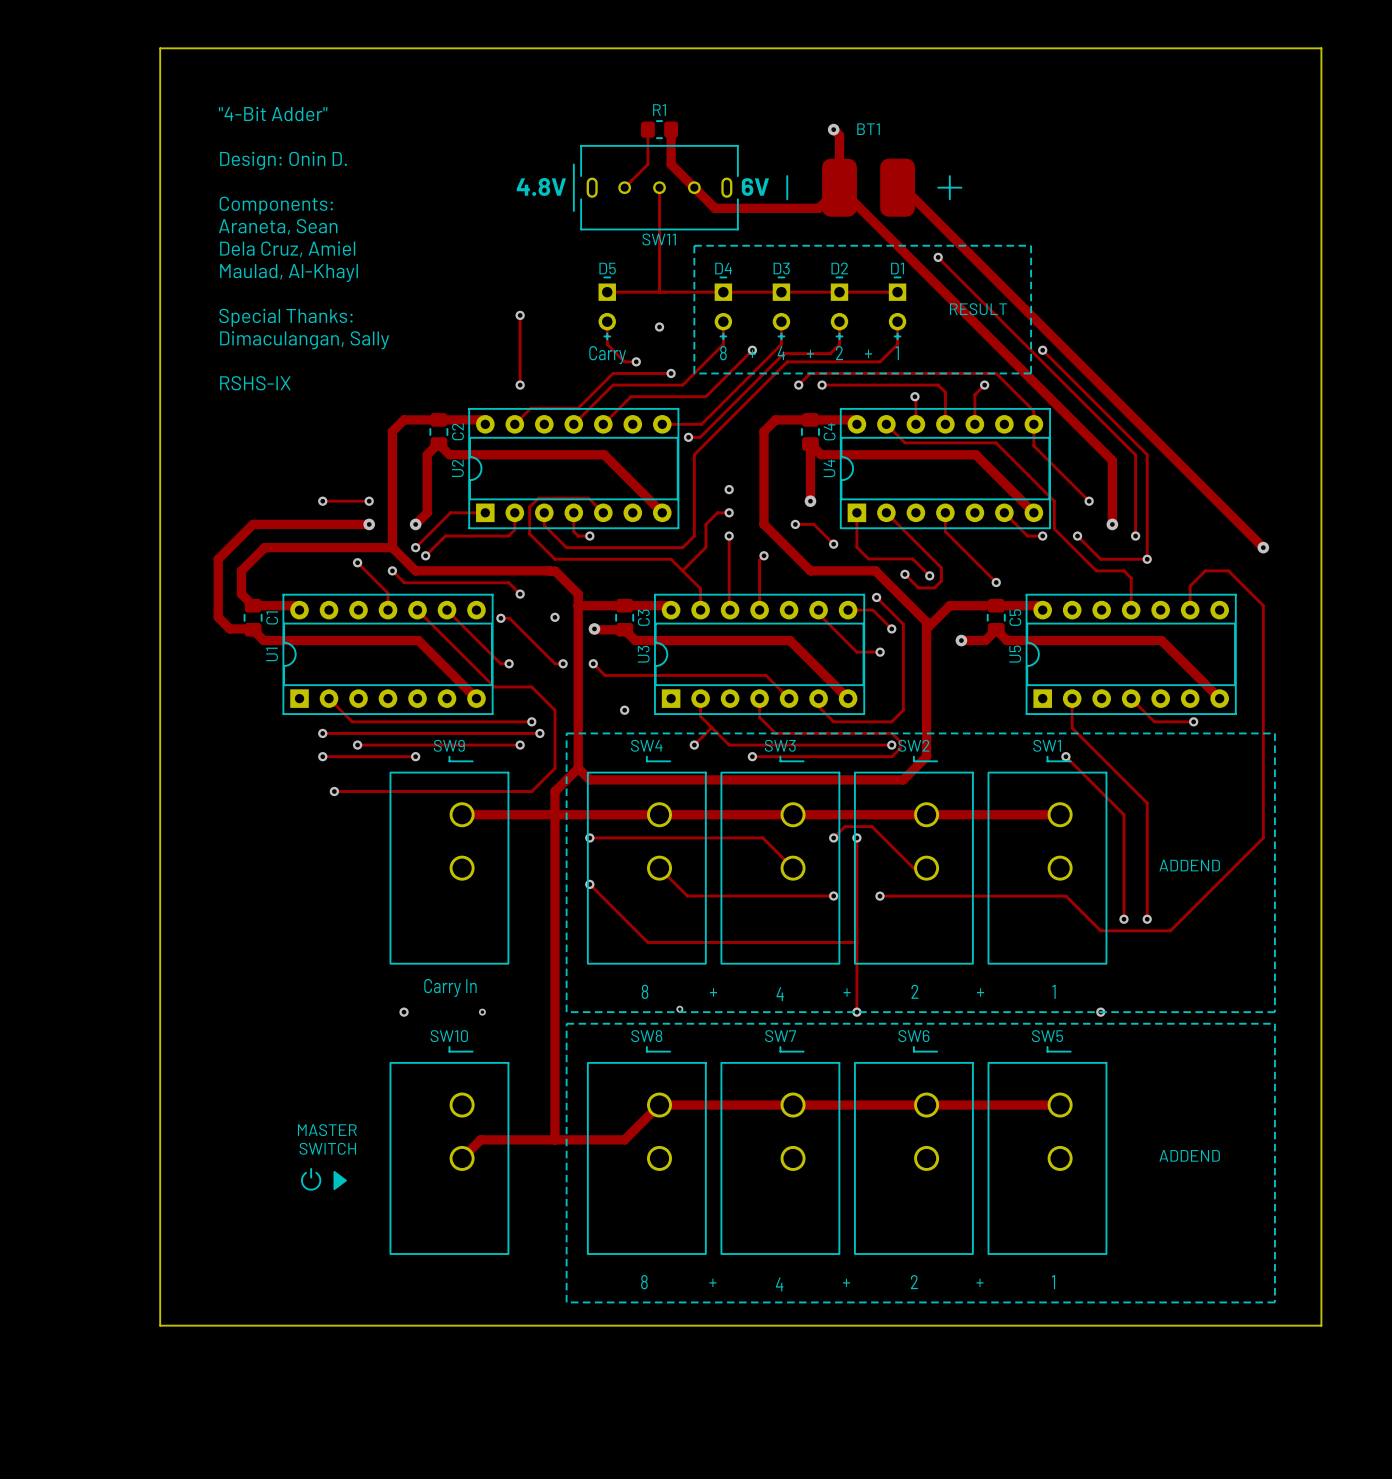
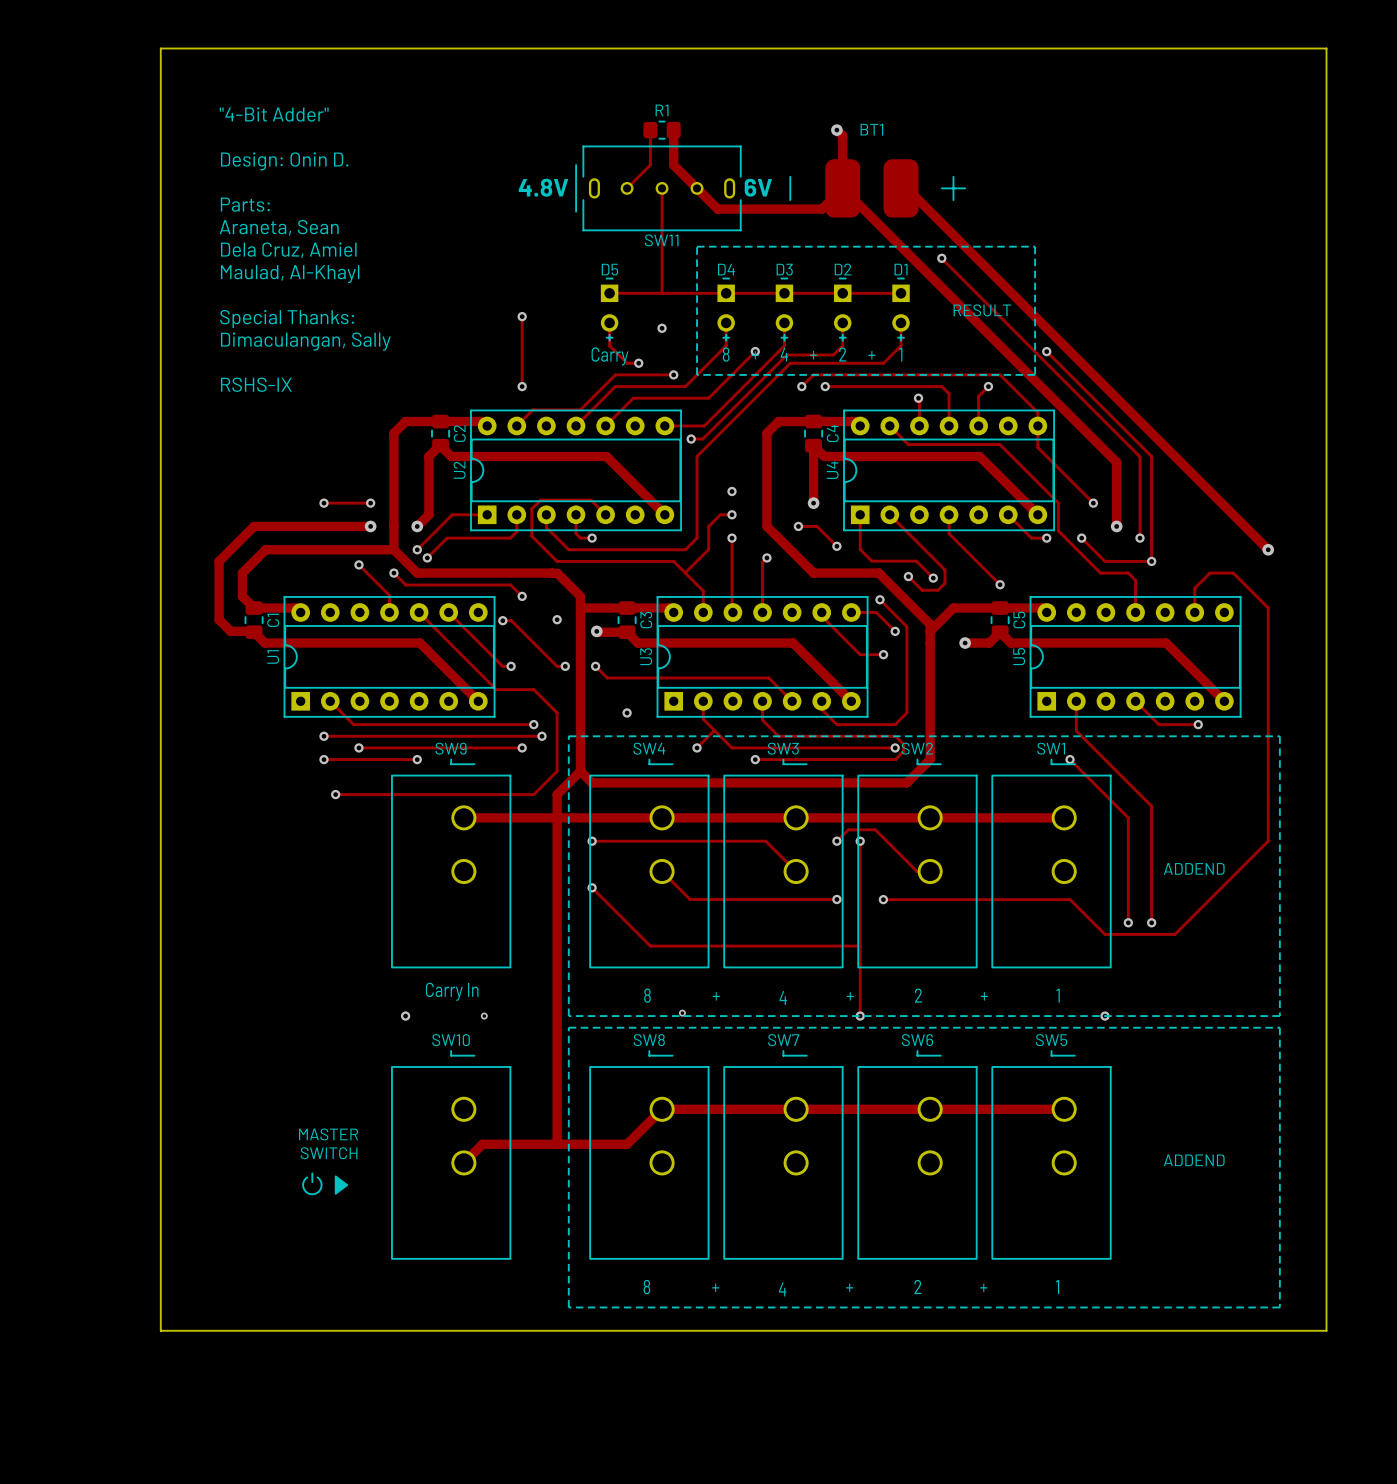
text: Components: (276, 205) -> Parts: (245, 204)

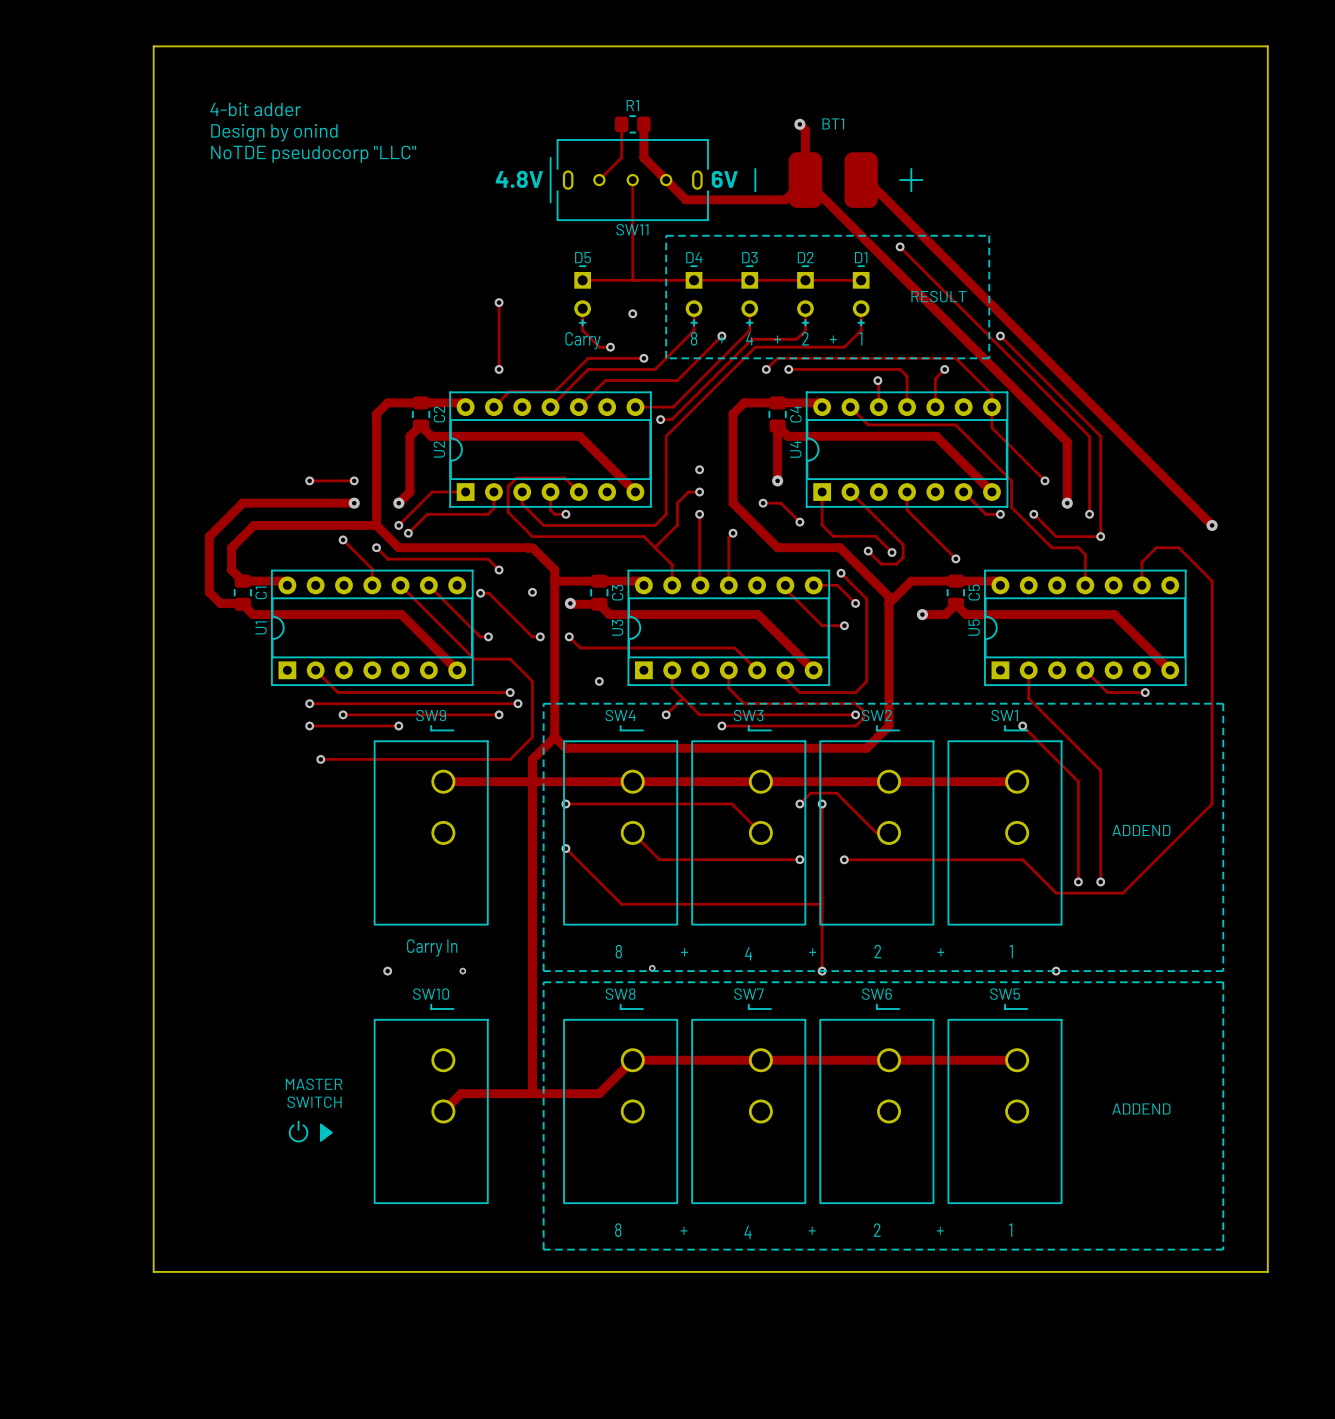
text: "4-Bit Adder" (274, 114) -> 4-bit adder (255, 109)
text: none -> Design by onind (274, 132)
text: Design: Onin D. (284, 161) -> NoTDE pseudocorp "LLC" (313, 154)
text: Parts: (245, 204) -> none
text: Araneta, Sean (279, 227) -> none
text: Dela Cruz, Amiel (288, 250) -> none
text: Maulad, Al-Khayl (290, 274) -> none
text: Special Thanks: (287, 318) -> none
text: Dimaculangan, Sally (305, 341) -> none
text: RSHS-IX (256, 384) -> none

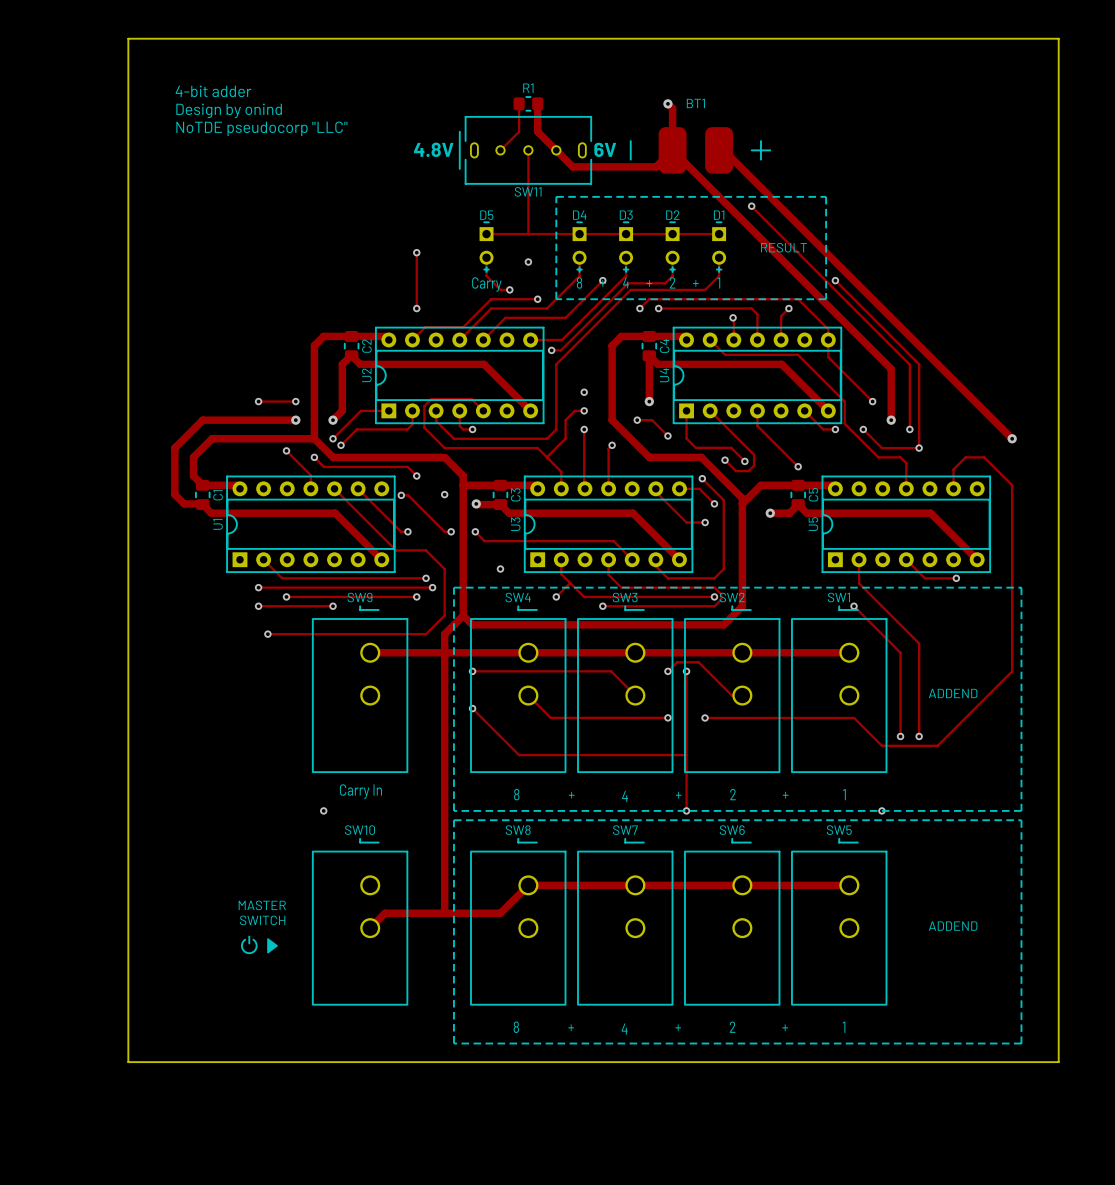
via: (652, 968) -> none
via: (462, 971) -> none

